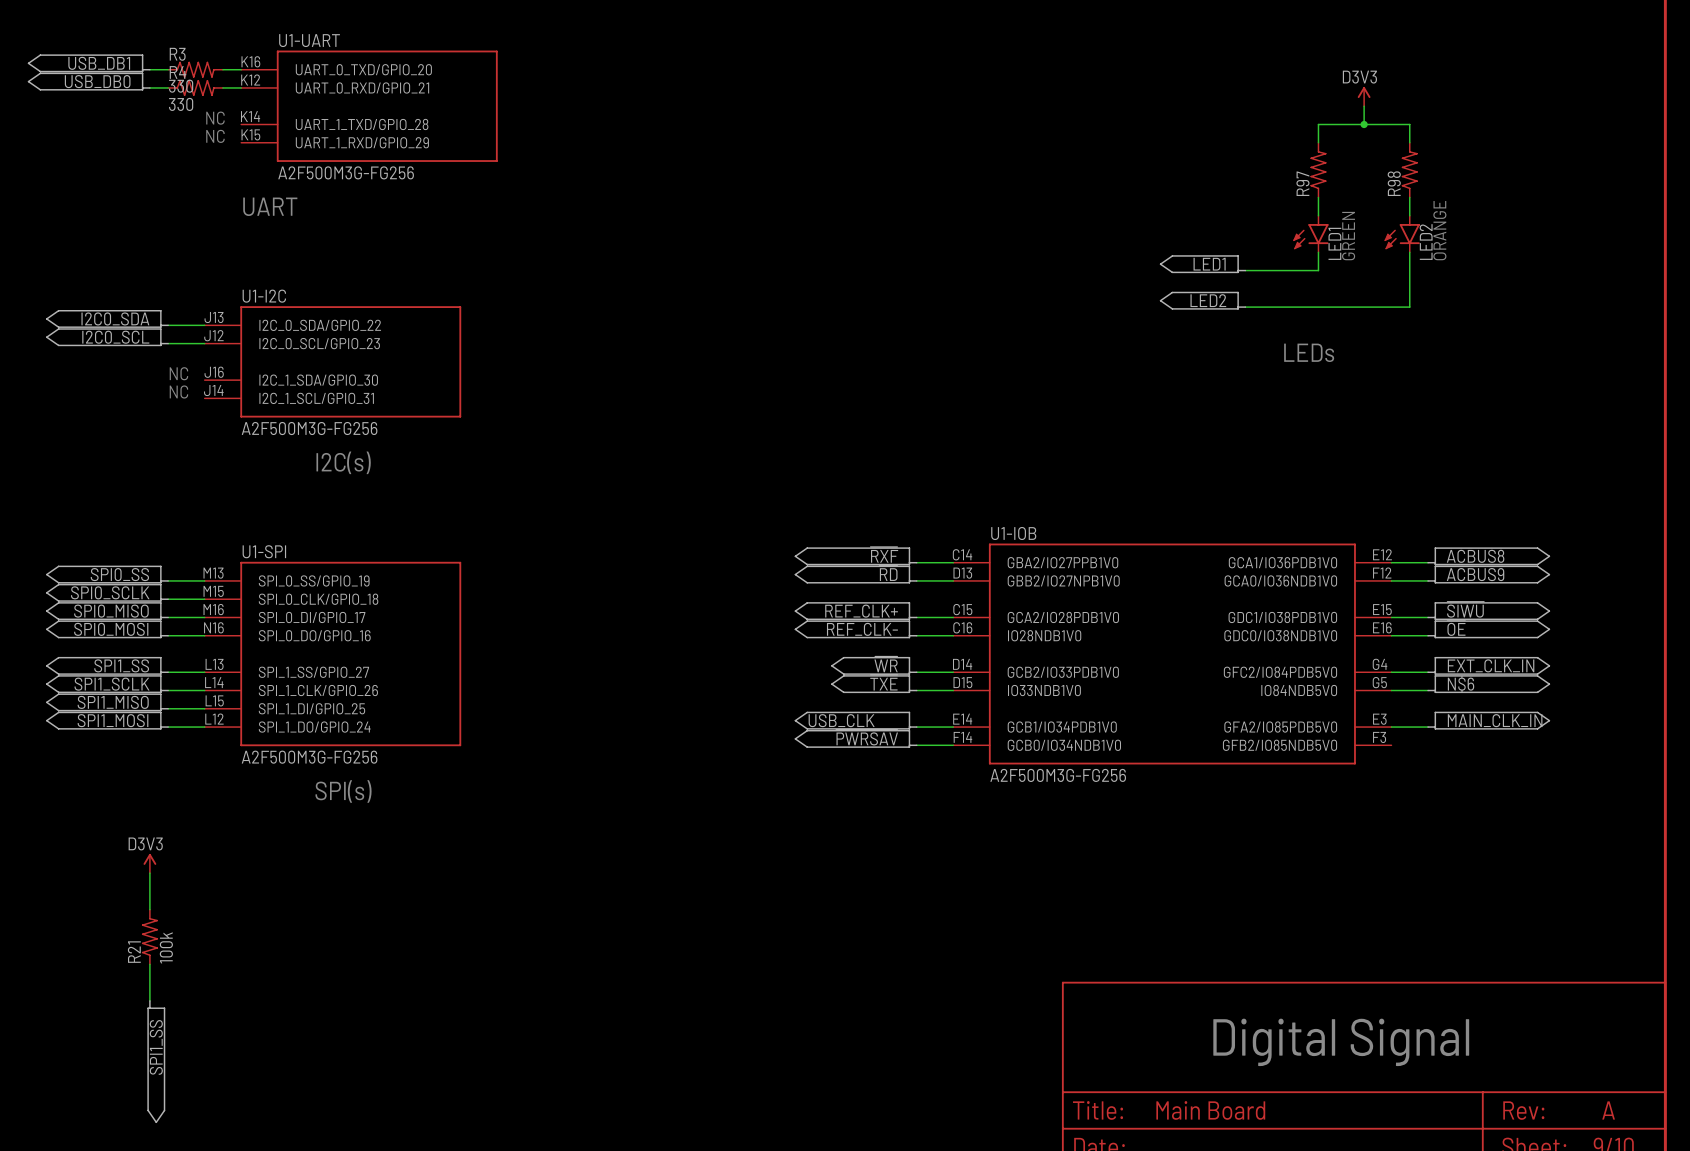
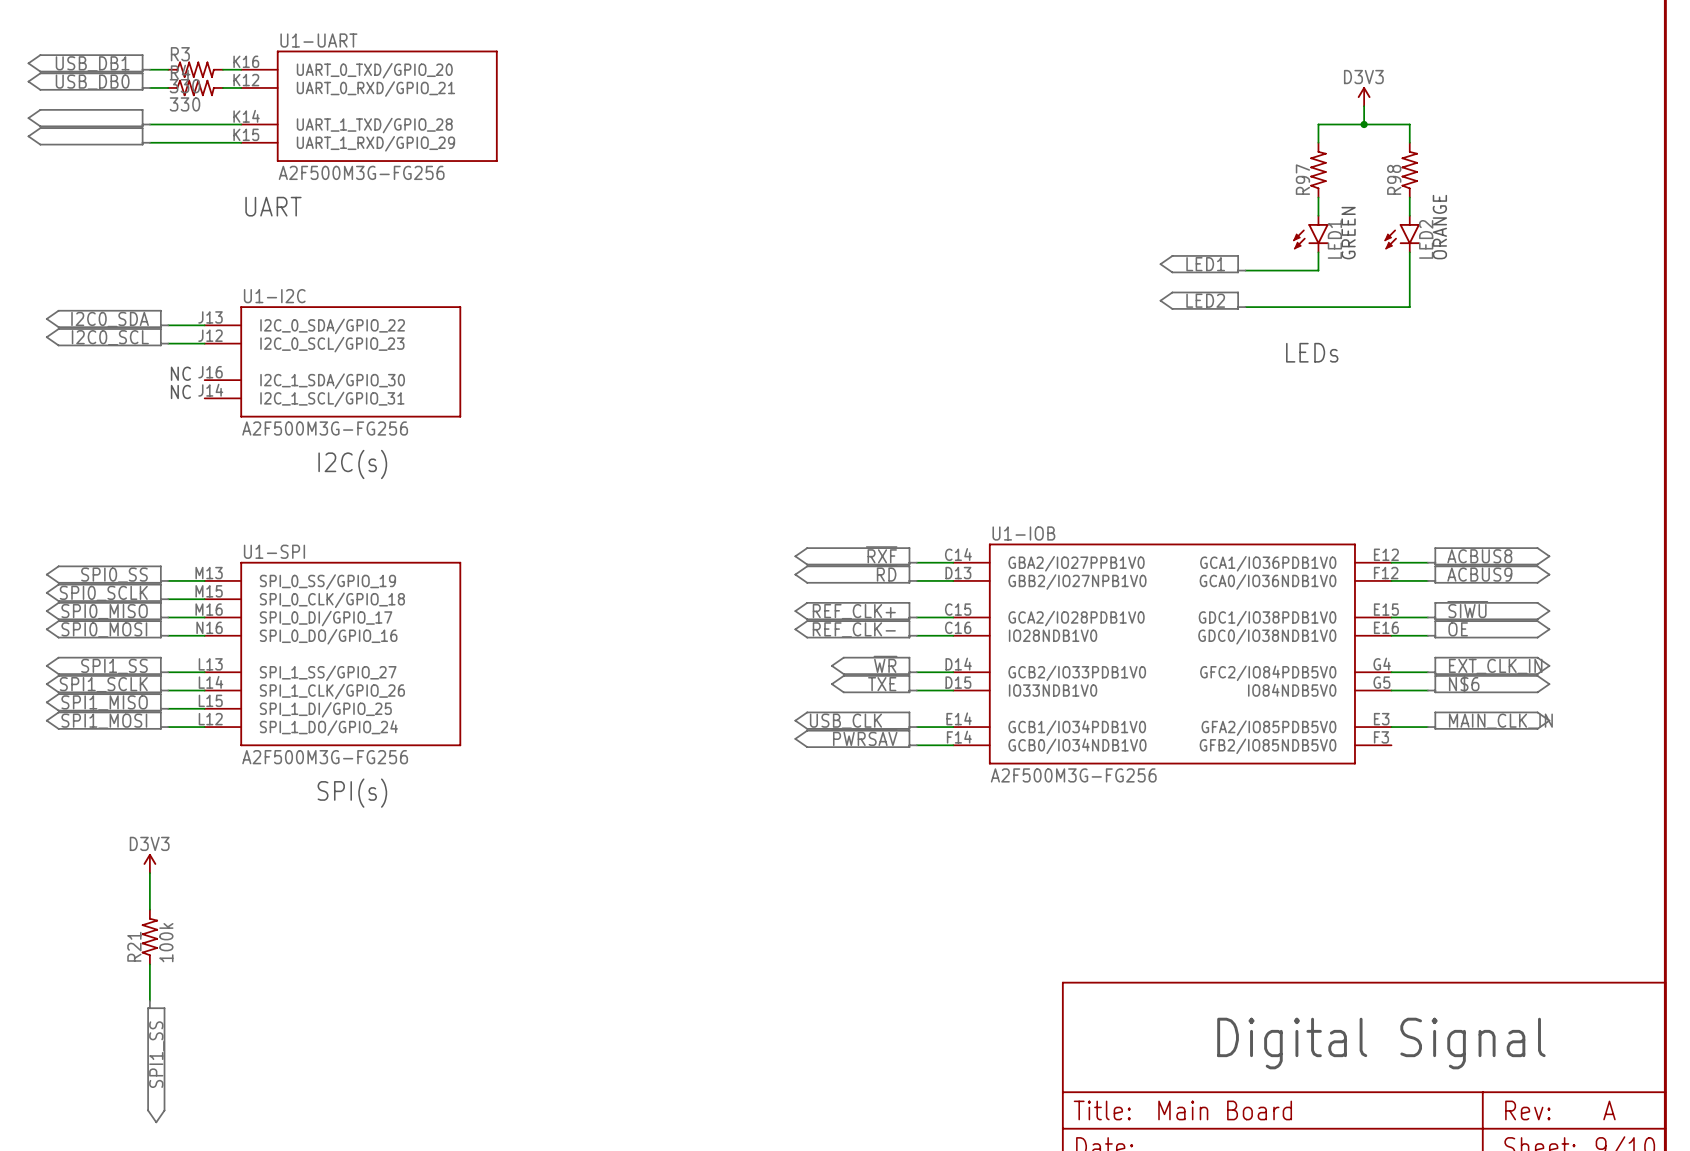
part: none -> (89, 118)
text: NC (215, 118) -> none
wire: none -> (149, 124) (241, 124)
part: none -> (89, 136)
text: NC (215, 136) -> none
wire: none -> (149, 142) (241, 142)

